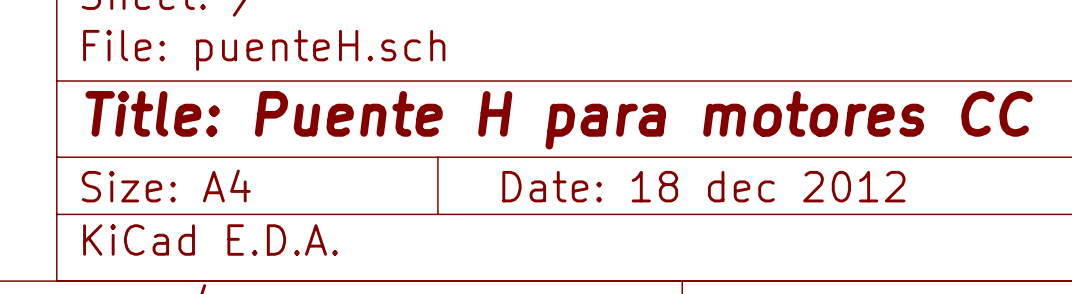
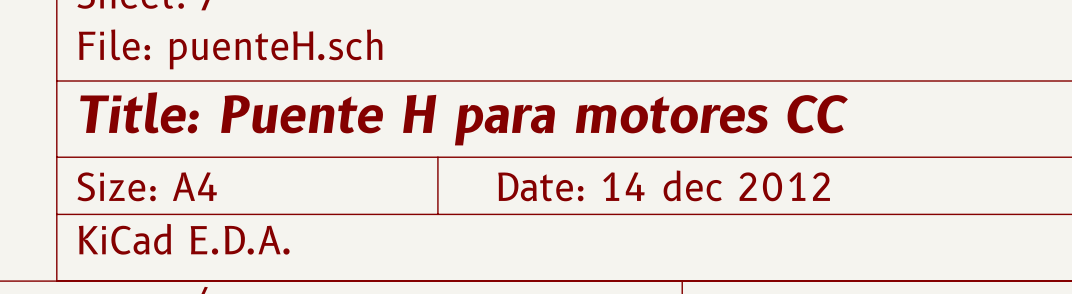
title block: Date: 18 dec 2012 (703, 186) -> Date: 14 dec 2012 (664, 185)

